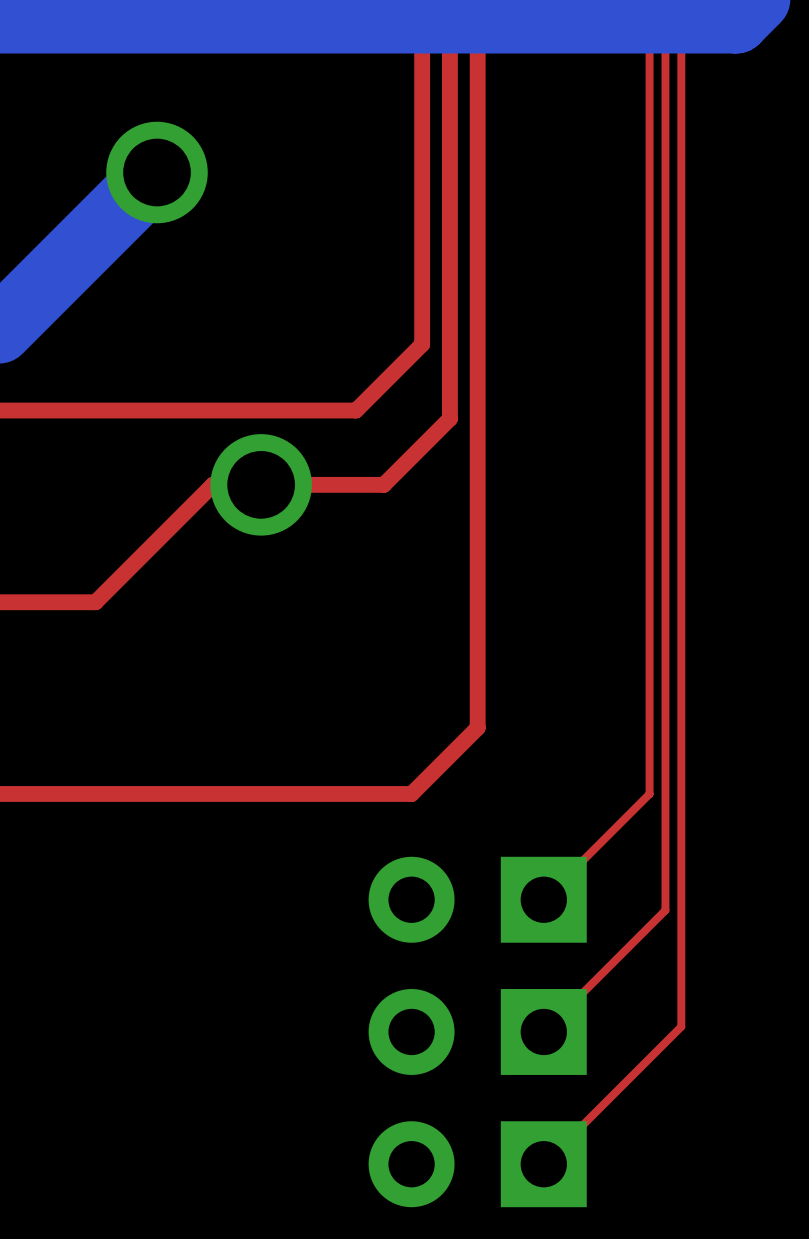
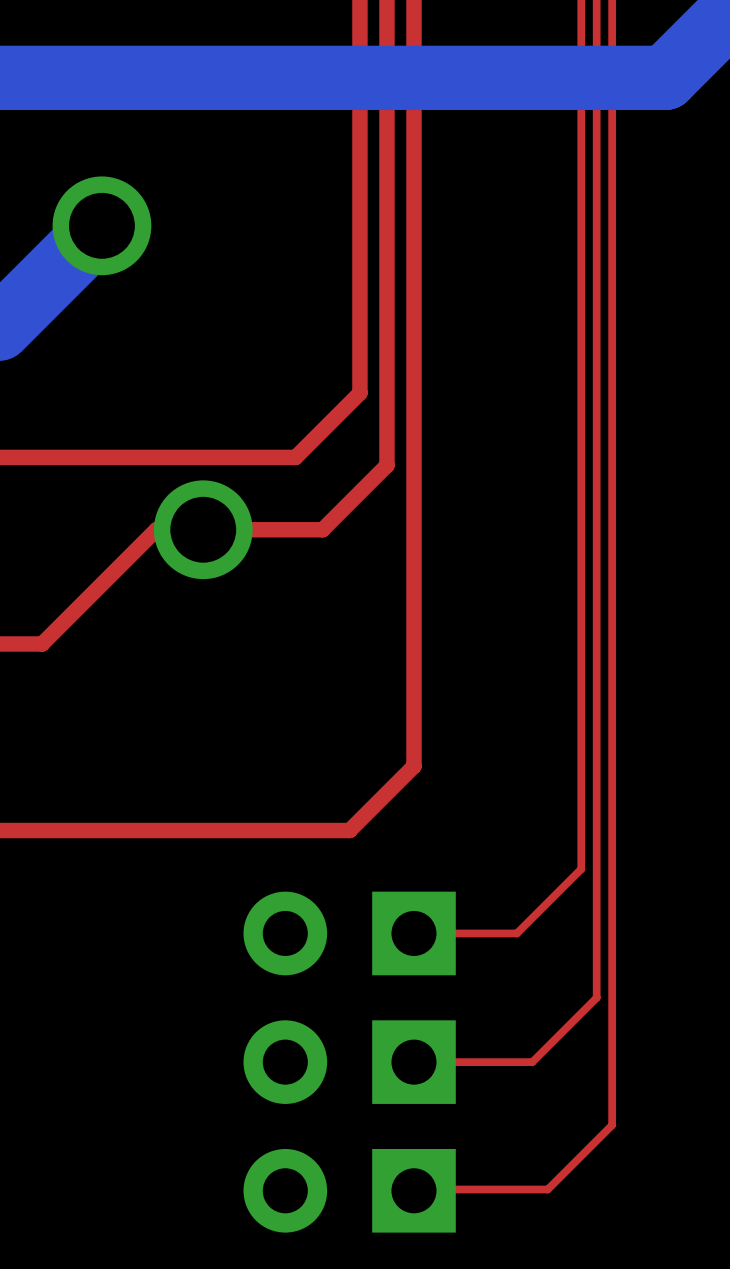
top track: (649, 793) (543, 899) -> (581, 830) (581, 869) (516, 933) (413, 933)
part position: (477, 899) -> (349, 933)
top track: (665, 910) (543, 1031) -> (596, 943) (596, 997) (532, 1062) (413, 1062)
top track: (681, 1026) (543, 1164) -> (612, 1056) (612, 1125) (547, 1189) (413, 1190)
part position: (477, 1031) -> (349, 1062)
part position: (477, 1164) -> (349, 1190)

